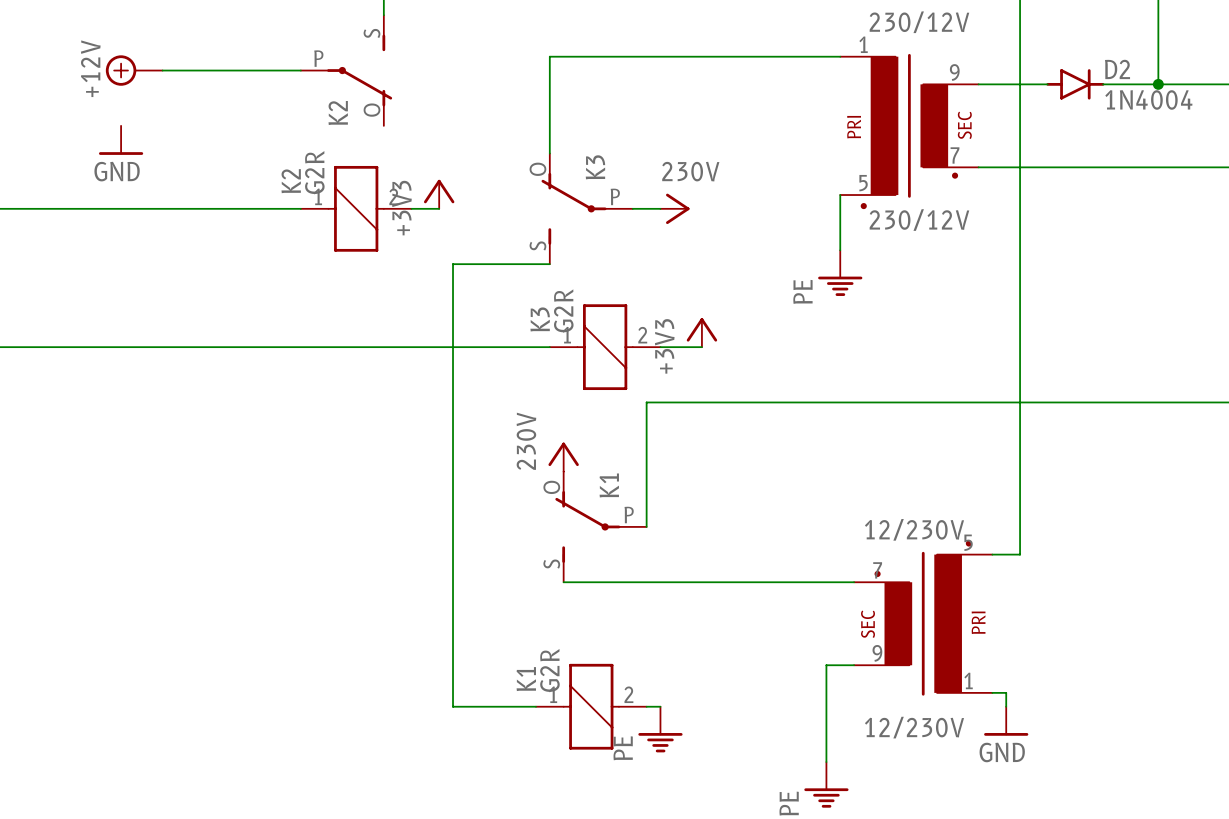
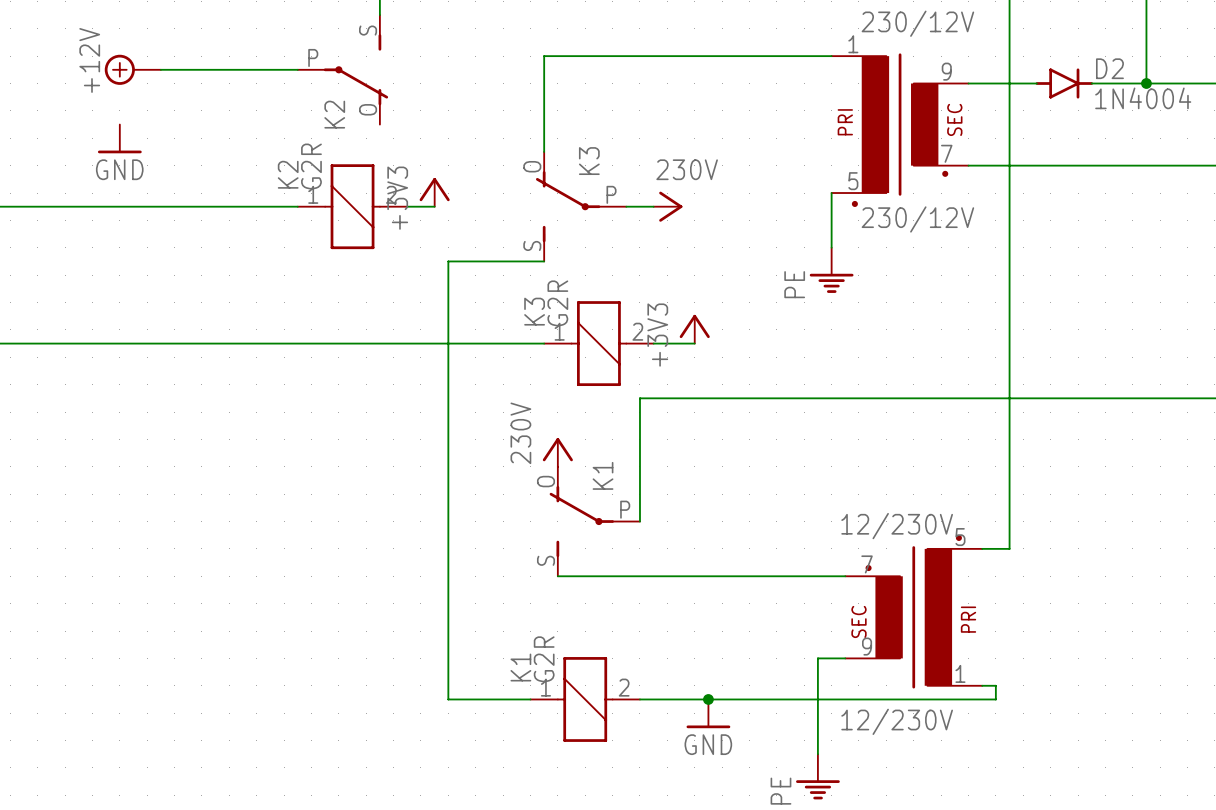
wire: none -> (653, 699) (995, 699)
junction: none -> (708, 699)
power symbol: none -> GND (708, 713)
power symbol: GND (1006, 721) -> none
power symbol: PE (660, 729) -> none

